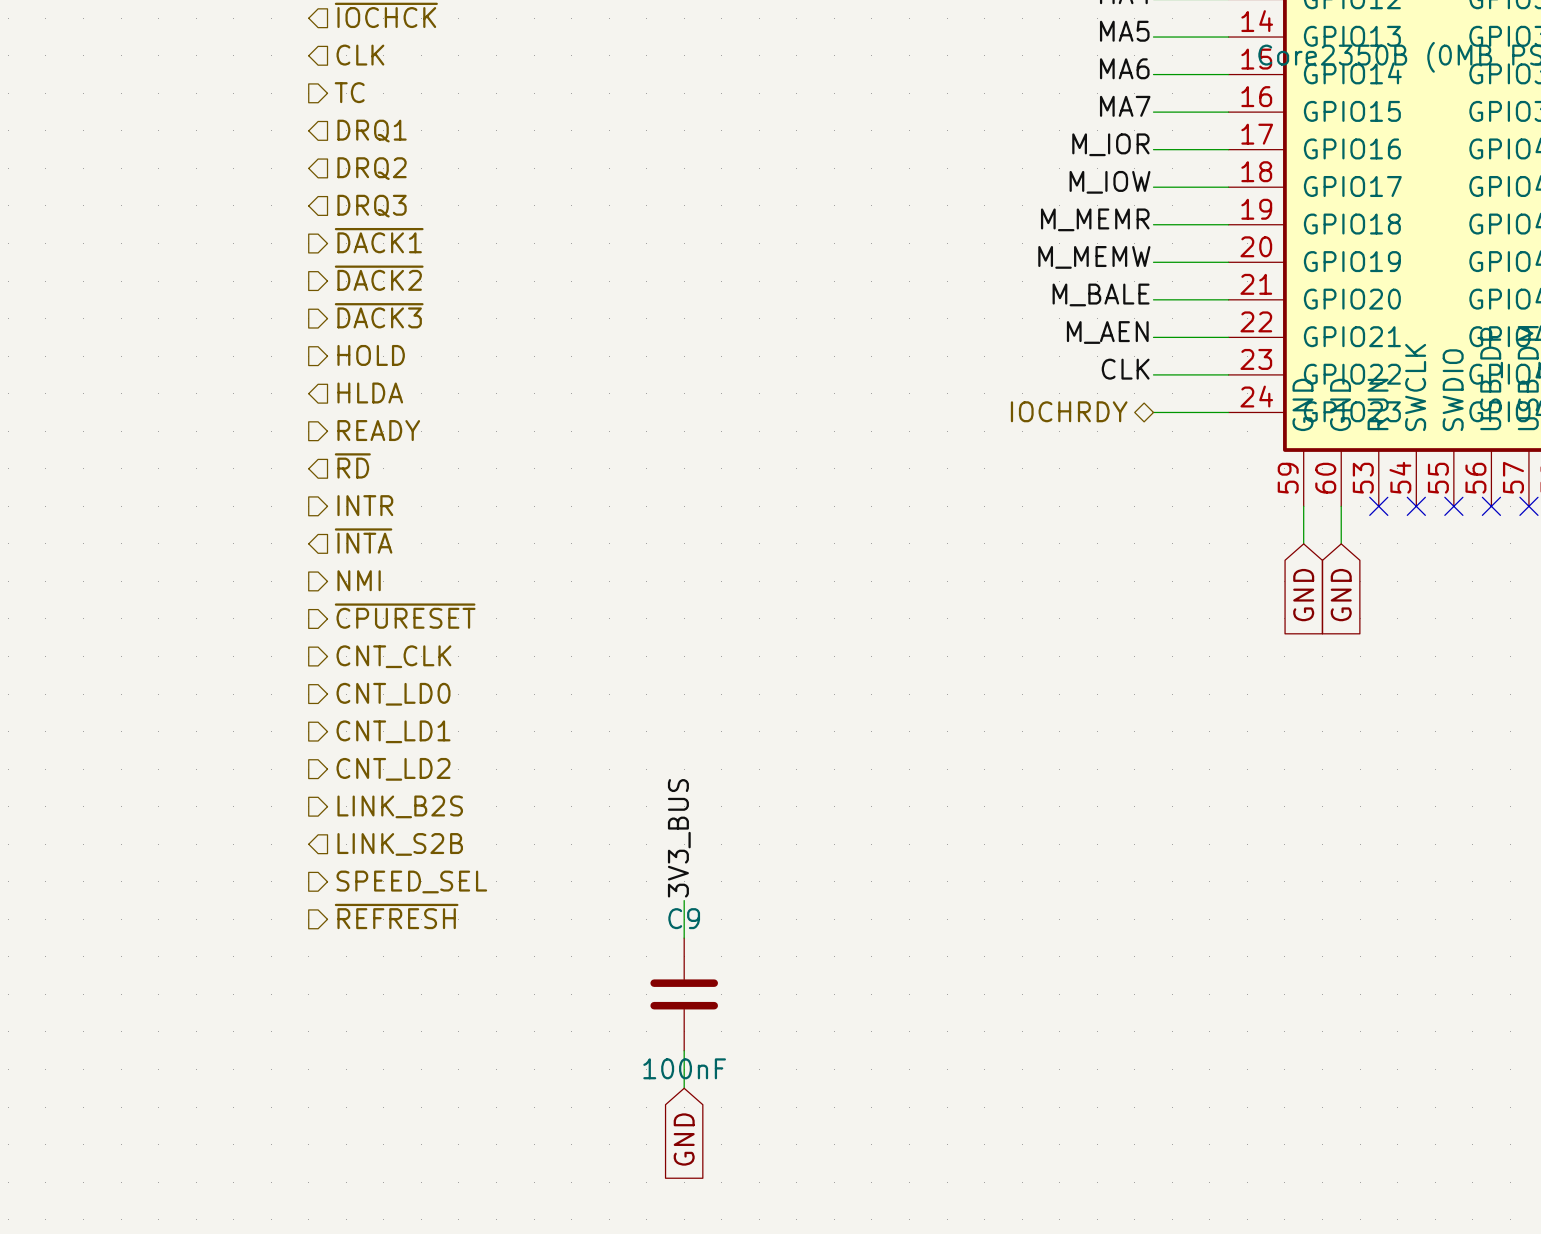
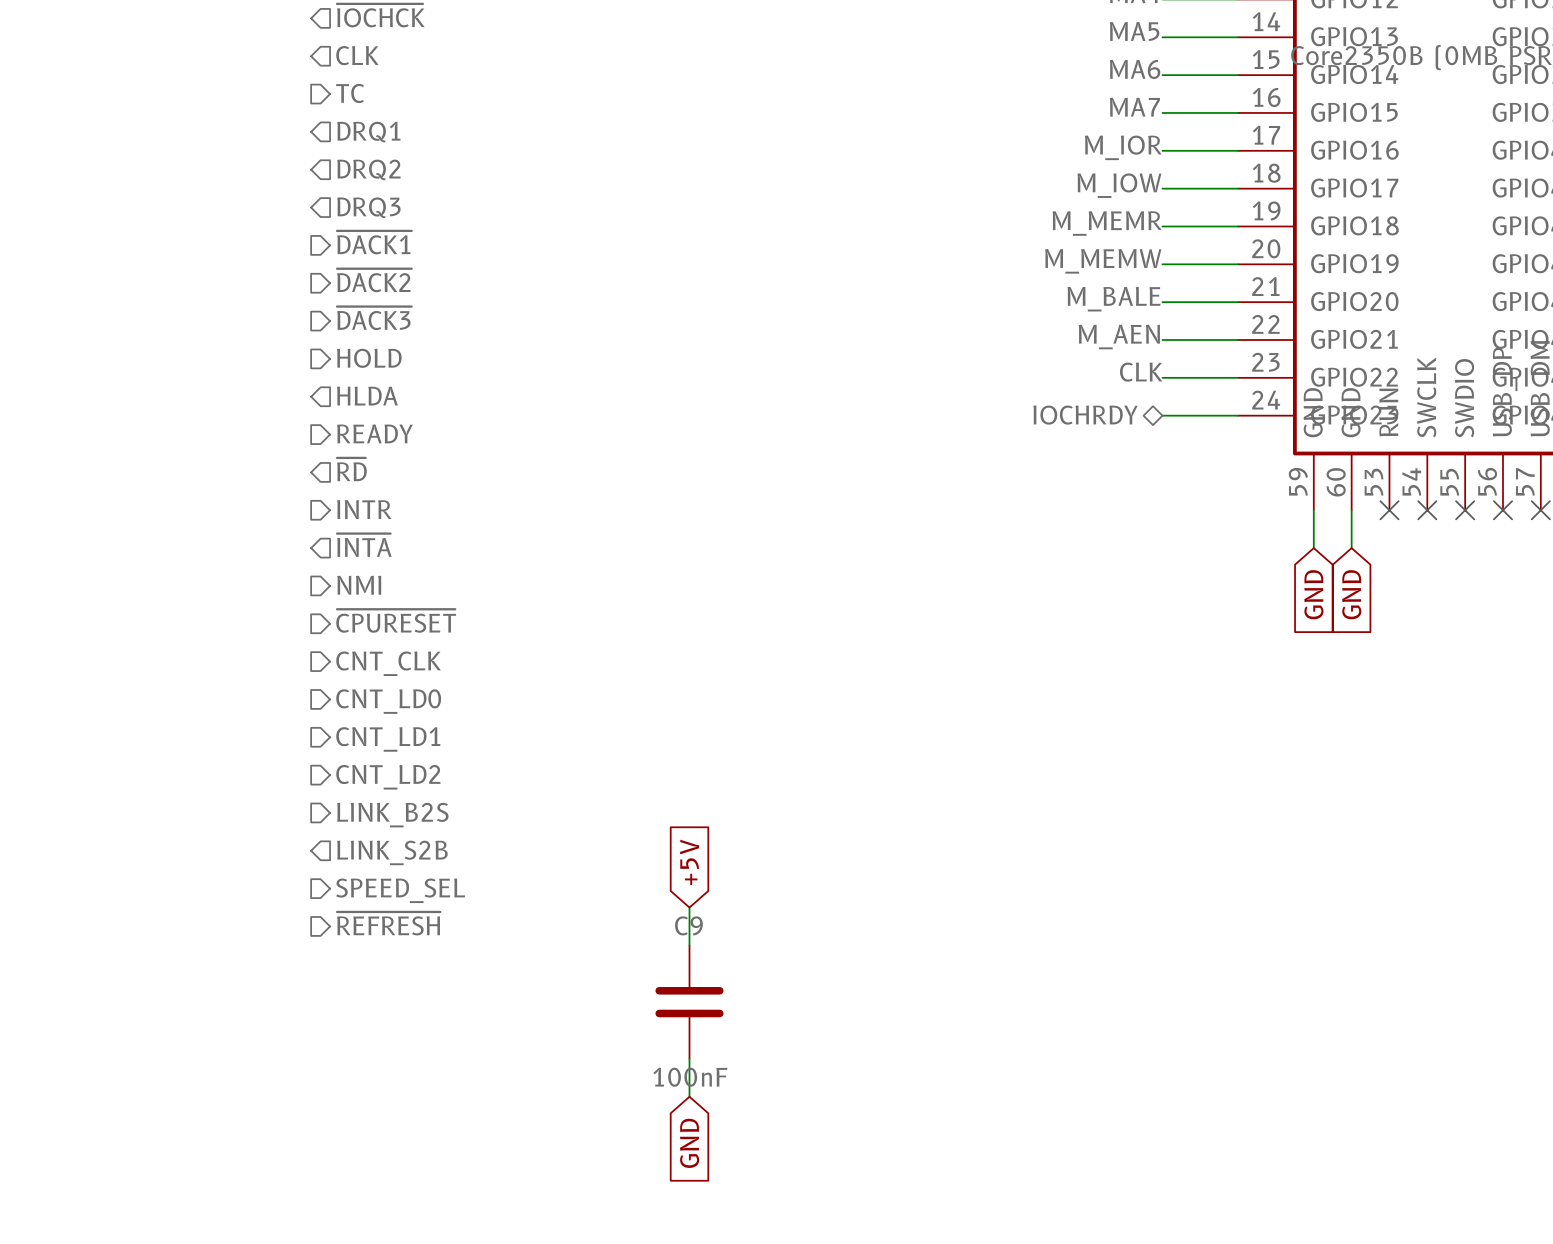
label: 3V3_BUS (679, 838) -> none
global label: none -> +5V (689, 862)

